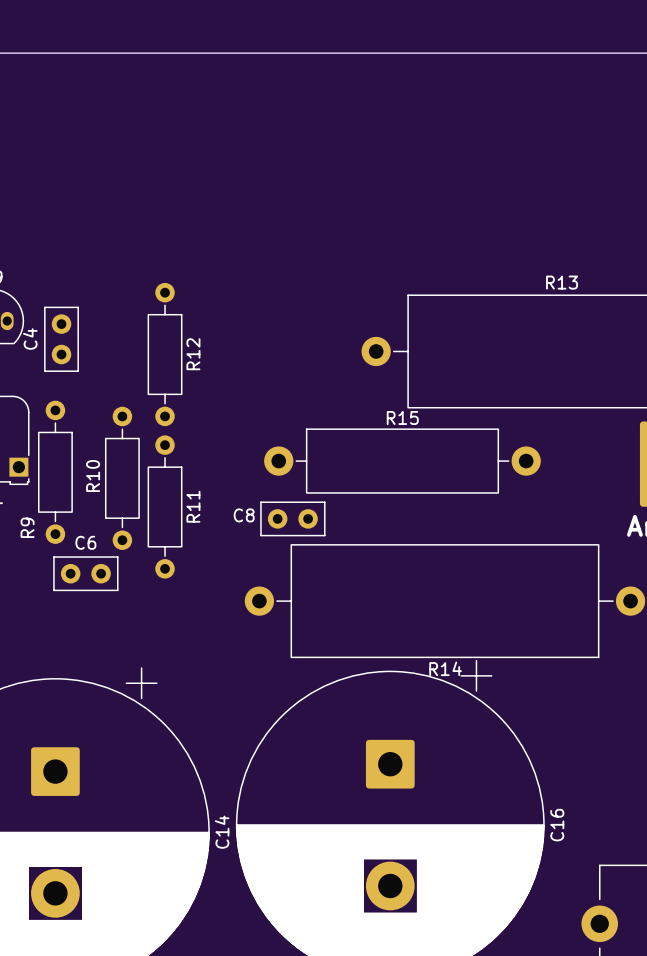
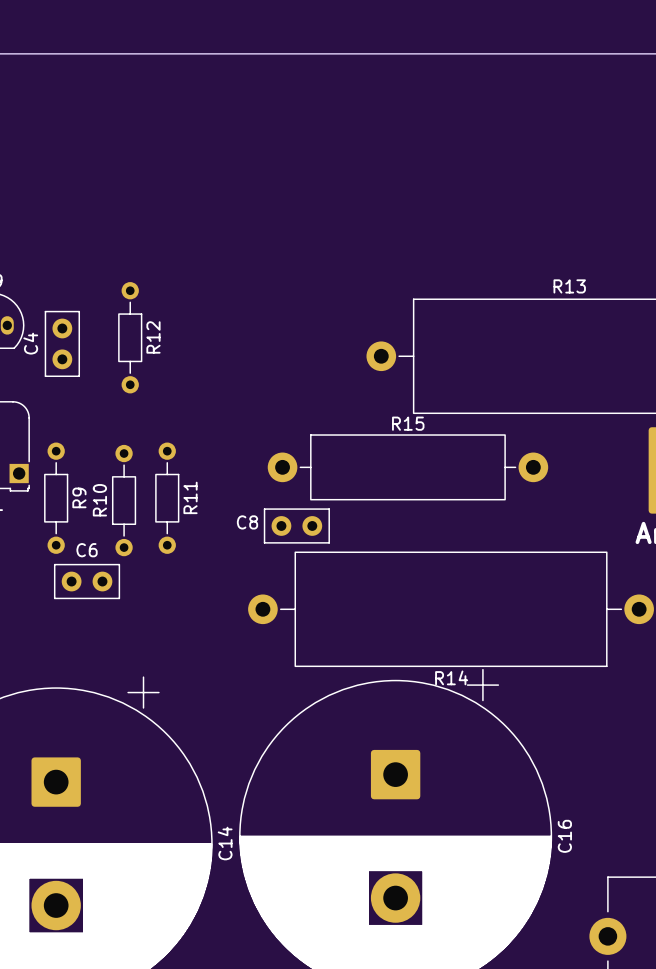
R12 footprint: [147, 282, 183, 427] -> [118, 282, 143, 394]
R9 footprint: [38, 400, 73, 544] -> [44, 442, 69, 554]
R10 footprint: [104, 406, 140, 550] -> [111, 444, 137, 557]
R11 footprint: [147, 435, 183, 579] -> [155, 442, 180, 554]
R9 name position: R9 (27, 527) -> R9 (79, 497)

